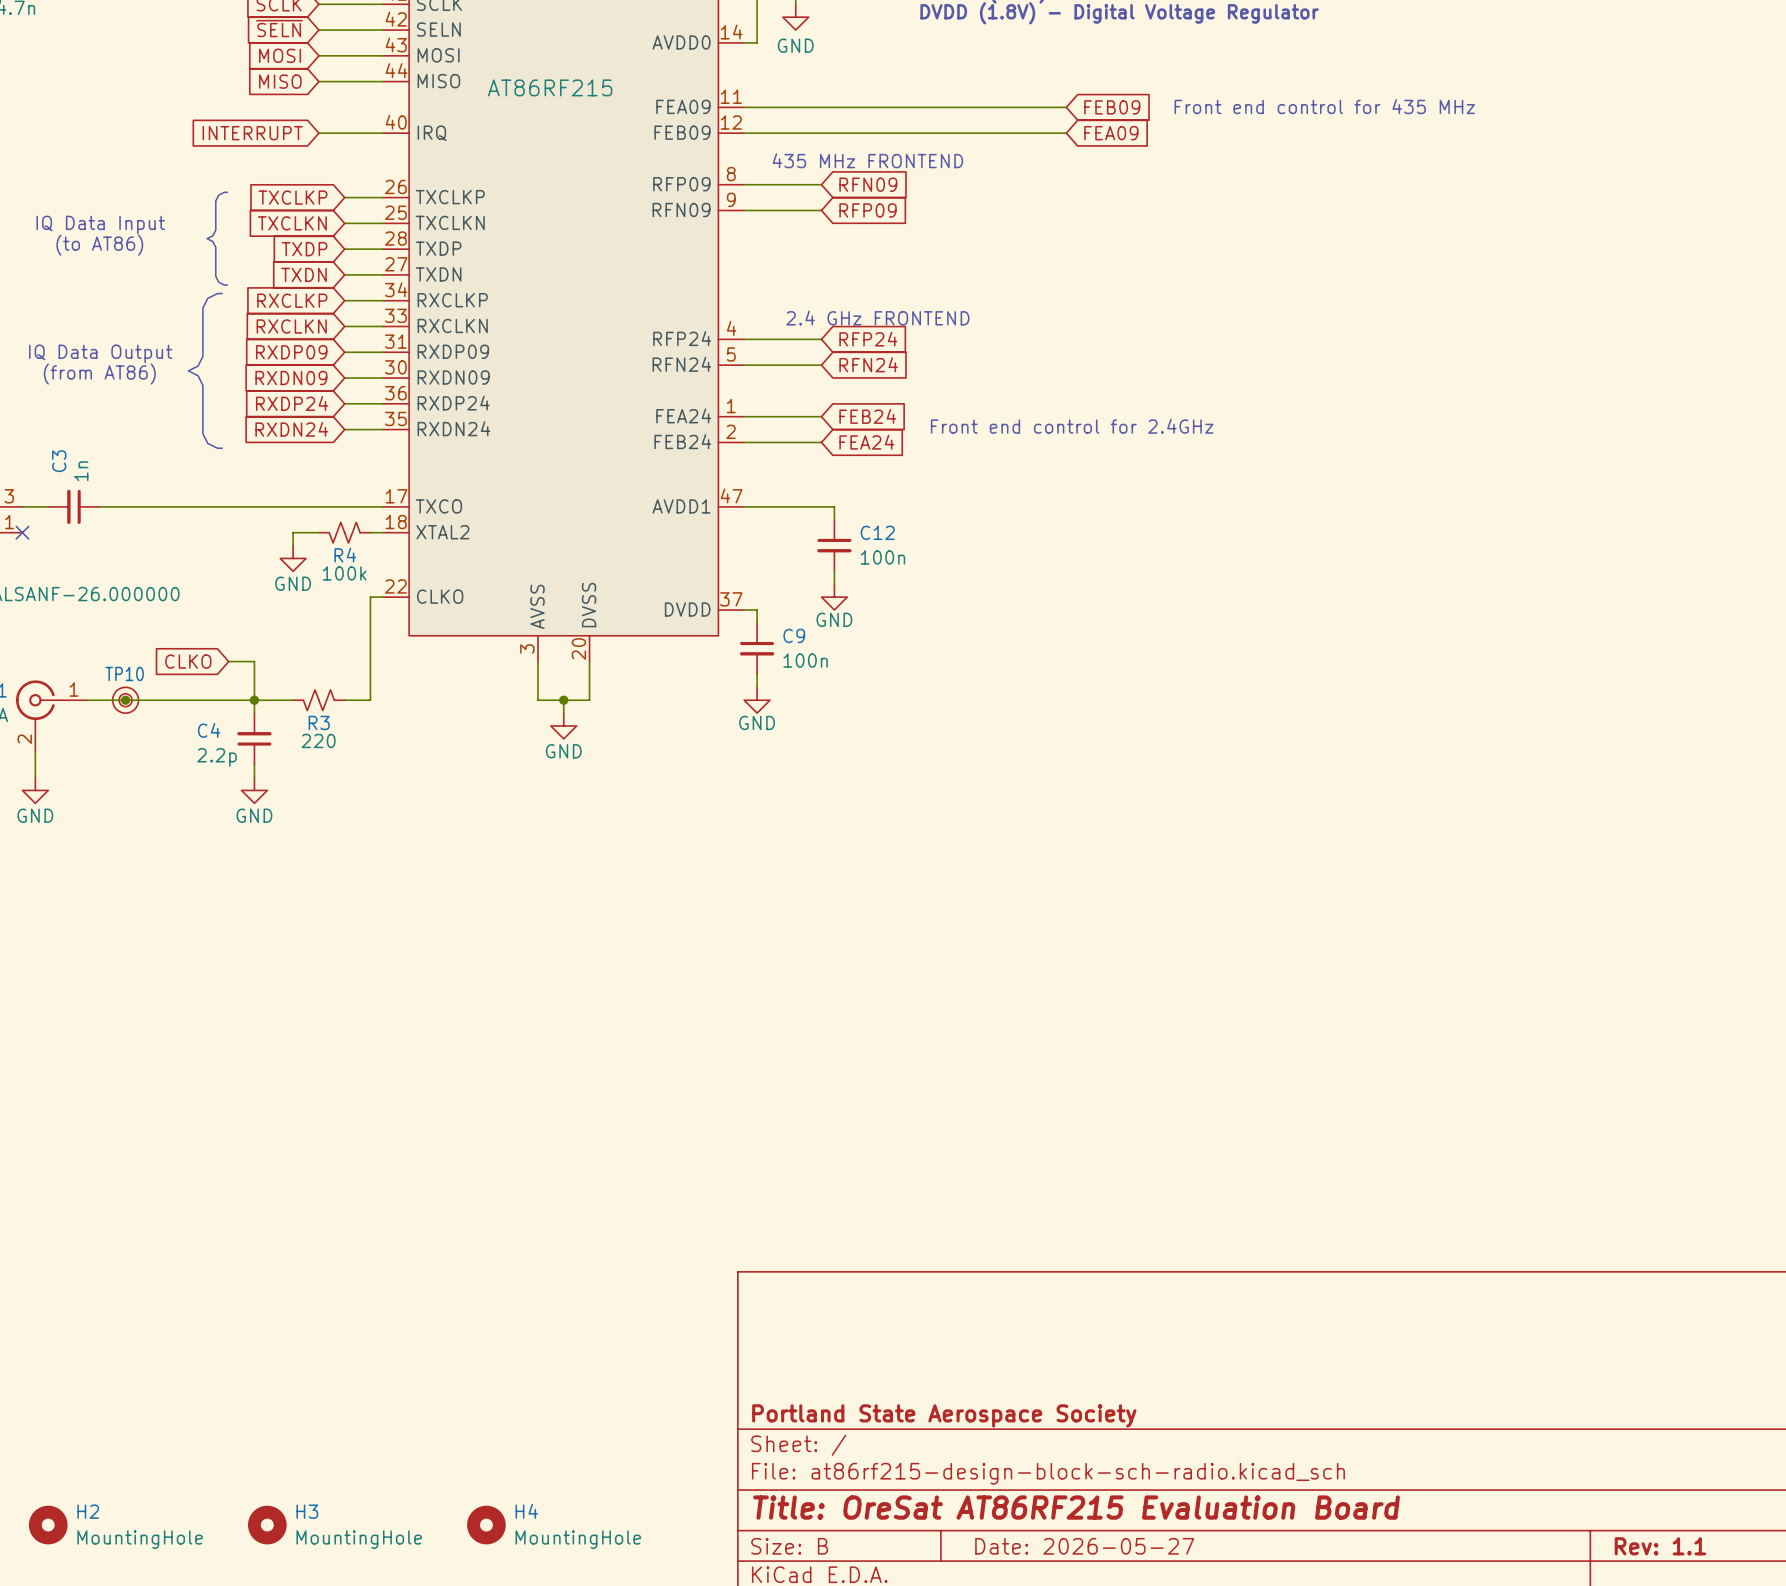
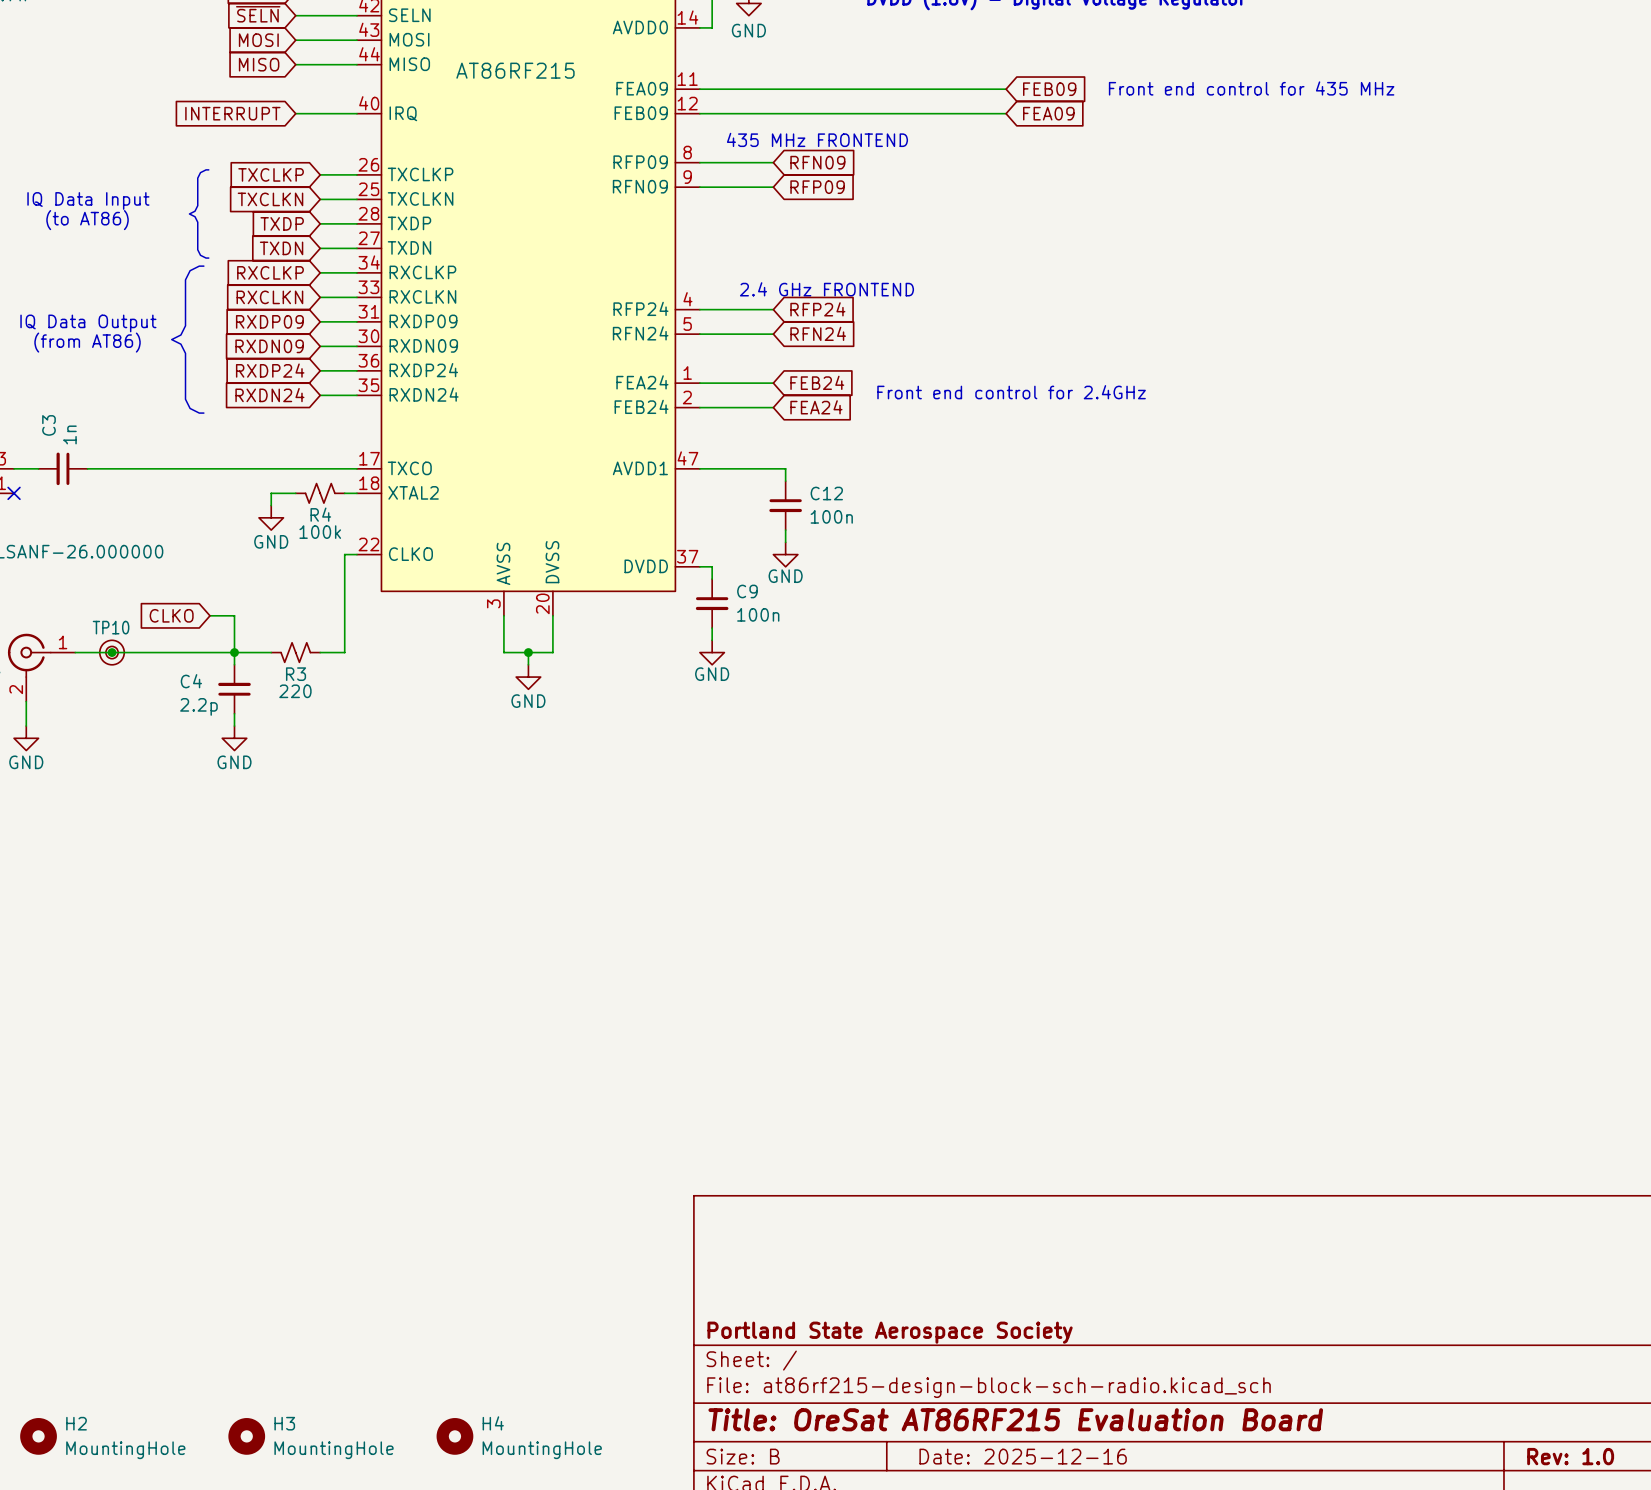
title block: Date: 2026-05-27 (1084, 1546) -> Date: 2025-12-16 (1023, 1456)
title block: Rev: 1.1 (1660, 1546) -> Rev: 1.0 (1570, 1456)

